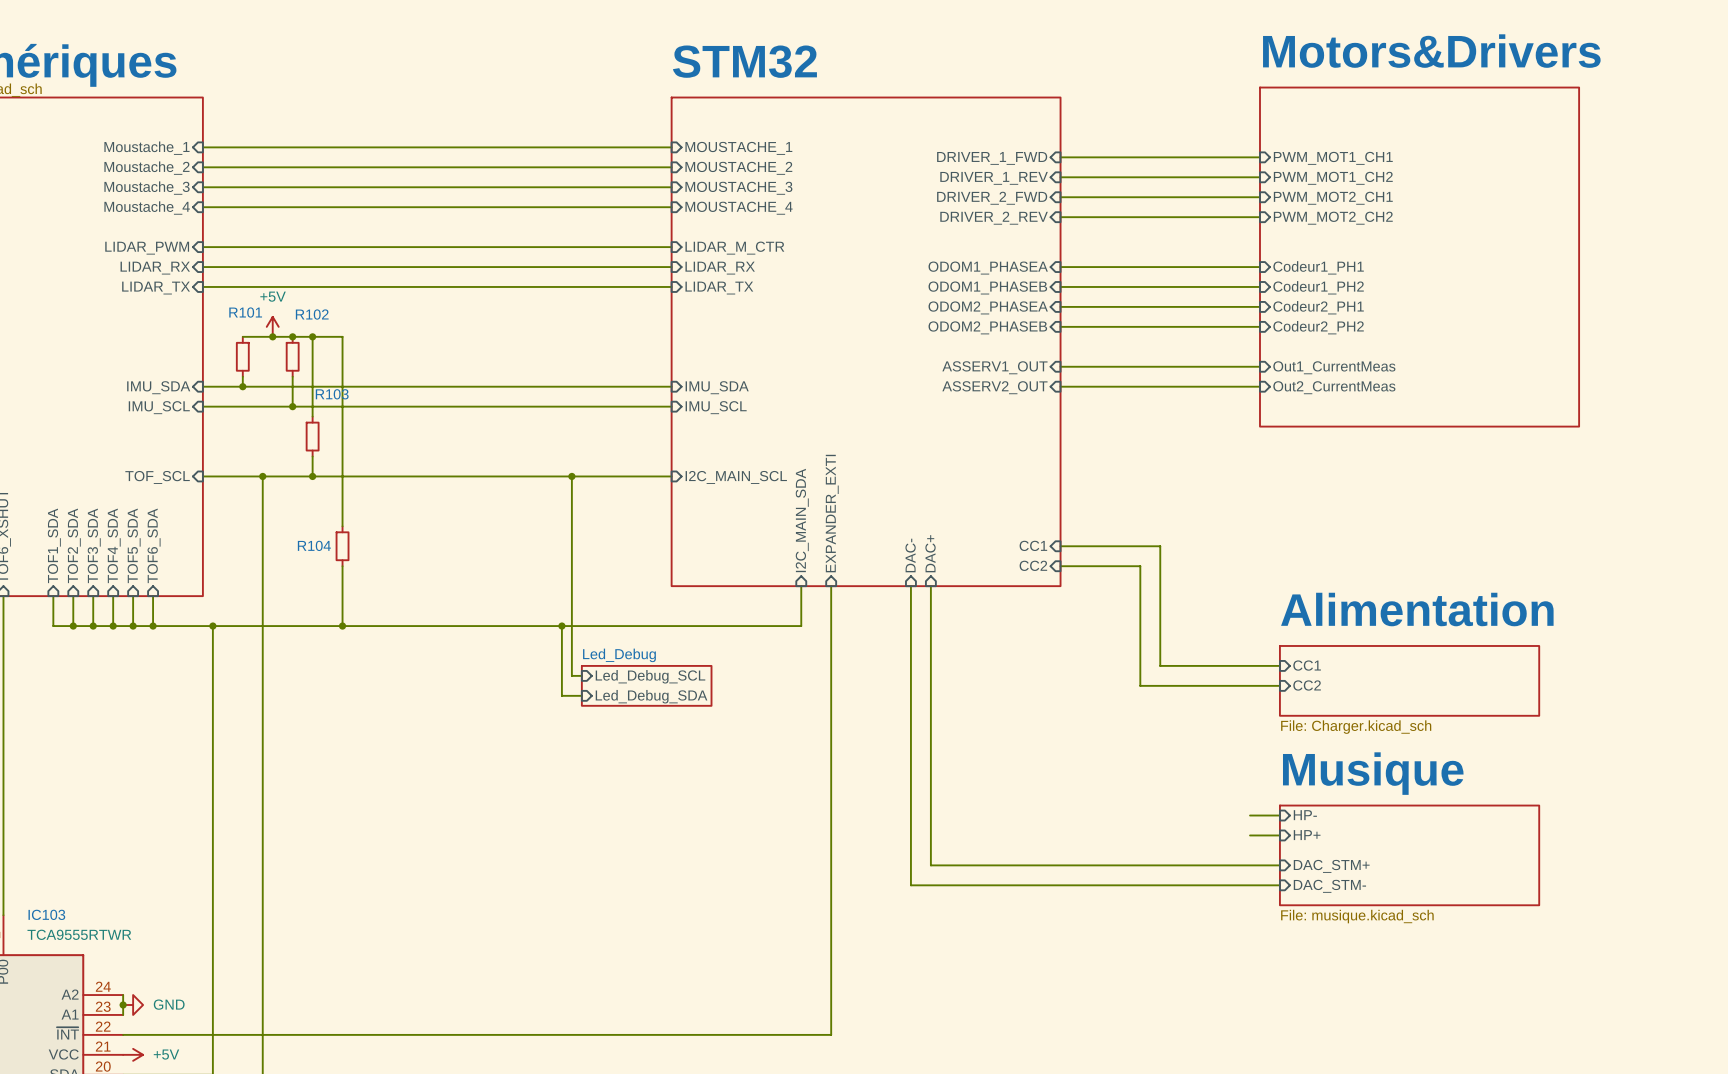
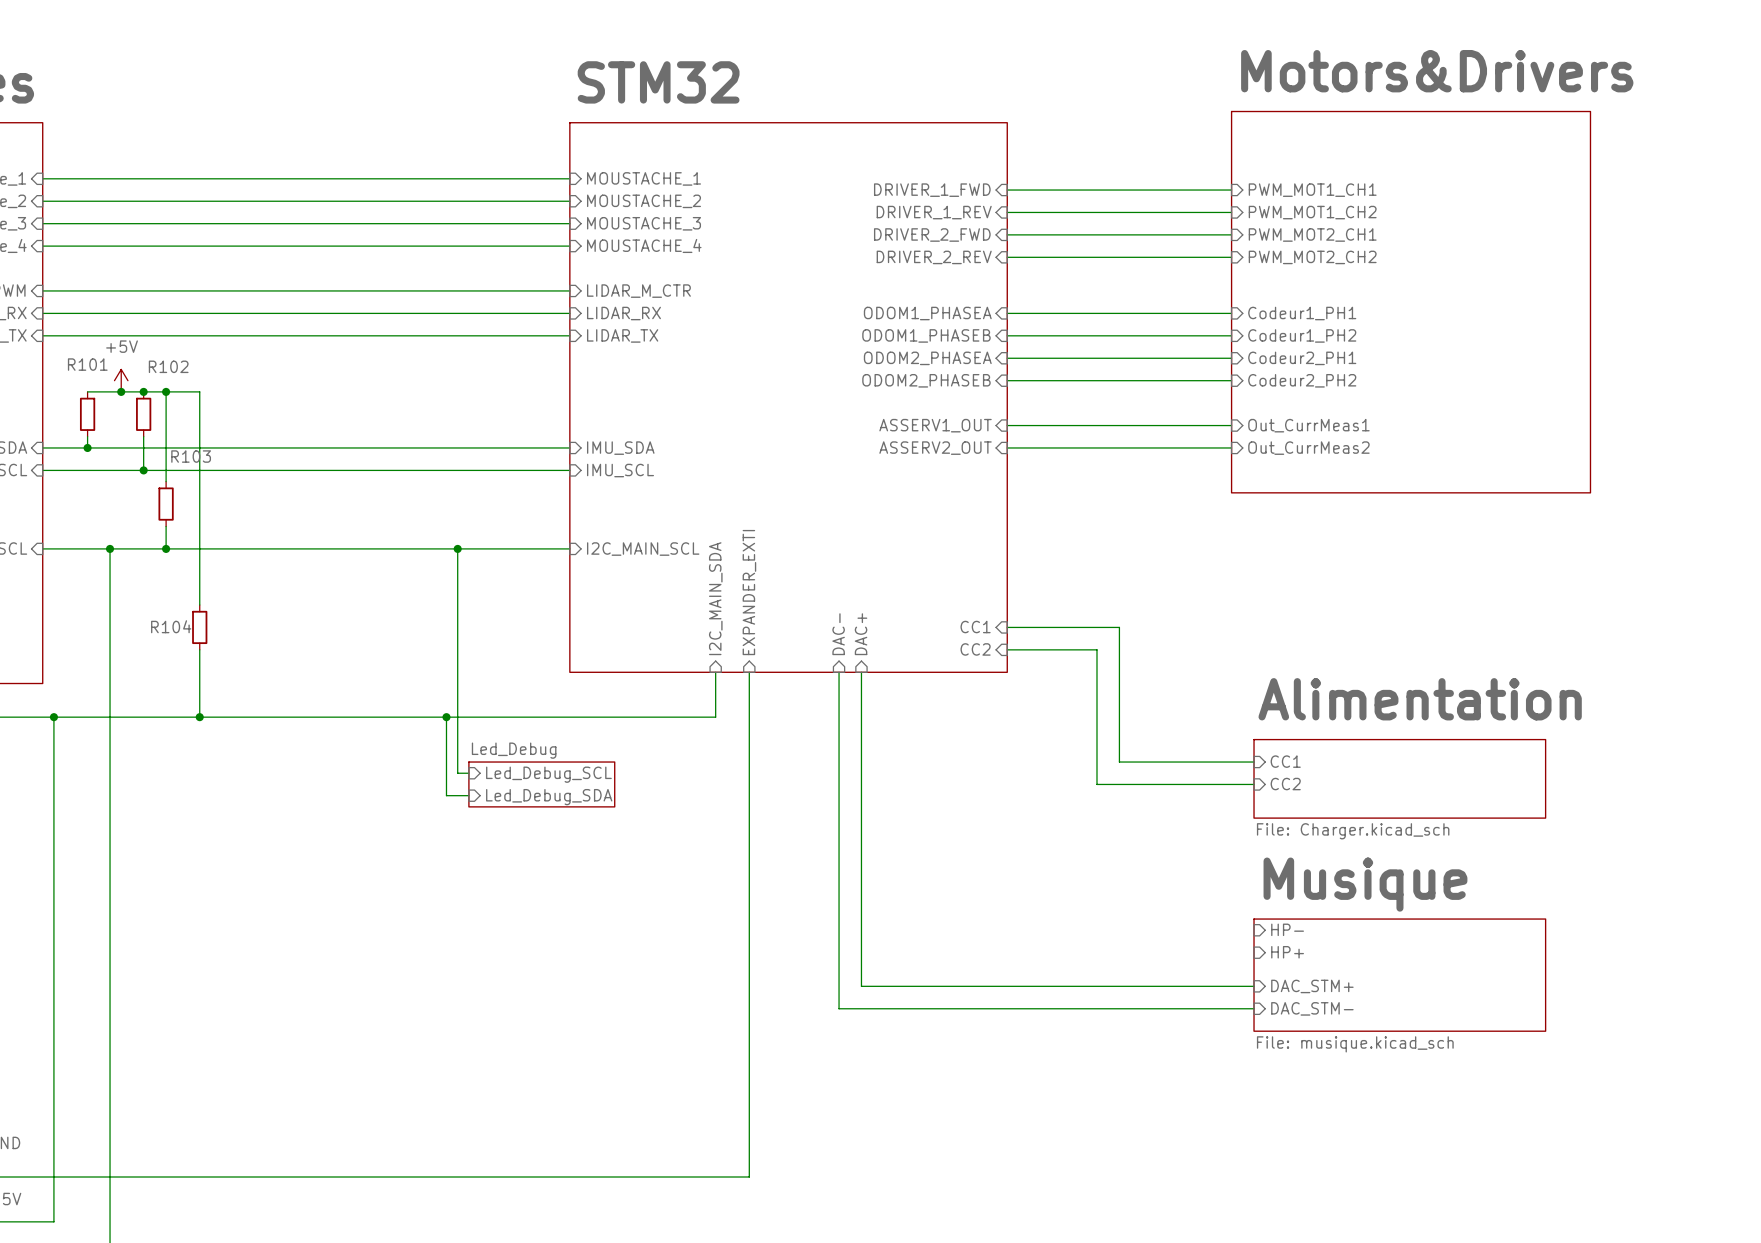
sheet pin: Out1_CurrentMeas (1334, 367) -> Out_CurrMeas1 (1308, 425)
sheet pin: Out2_CurrentMeas (1334, 387) -> Out_CurrMeas2 (1308, 448)
wire: (1250, 815) (1279, 815) -> none
wire: (1250, 835) (1279, 835) -> none

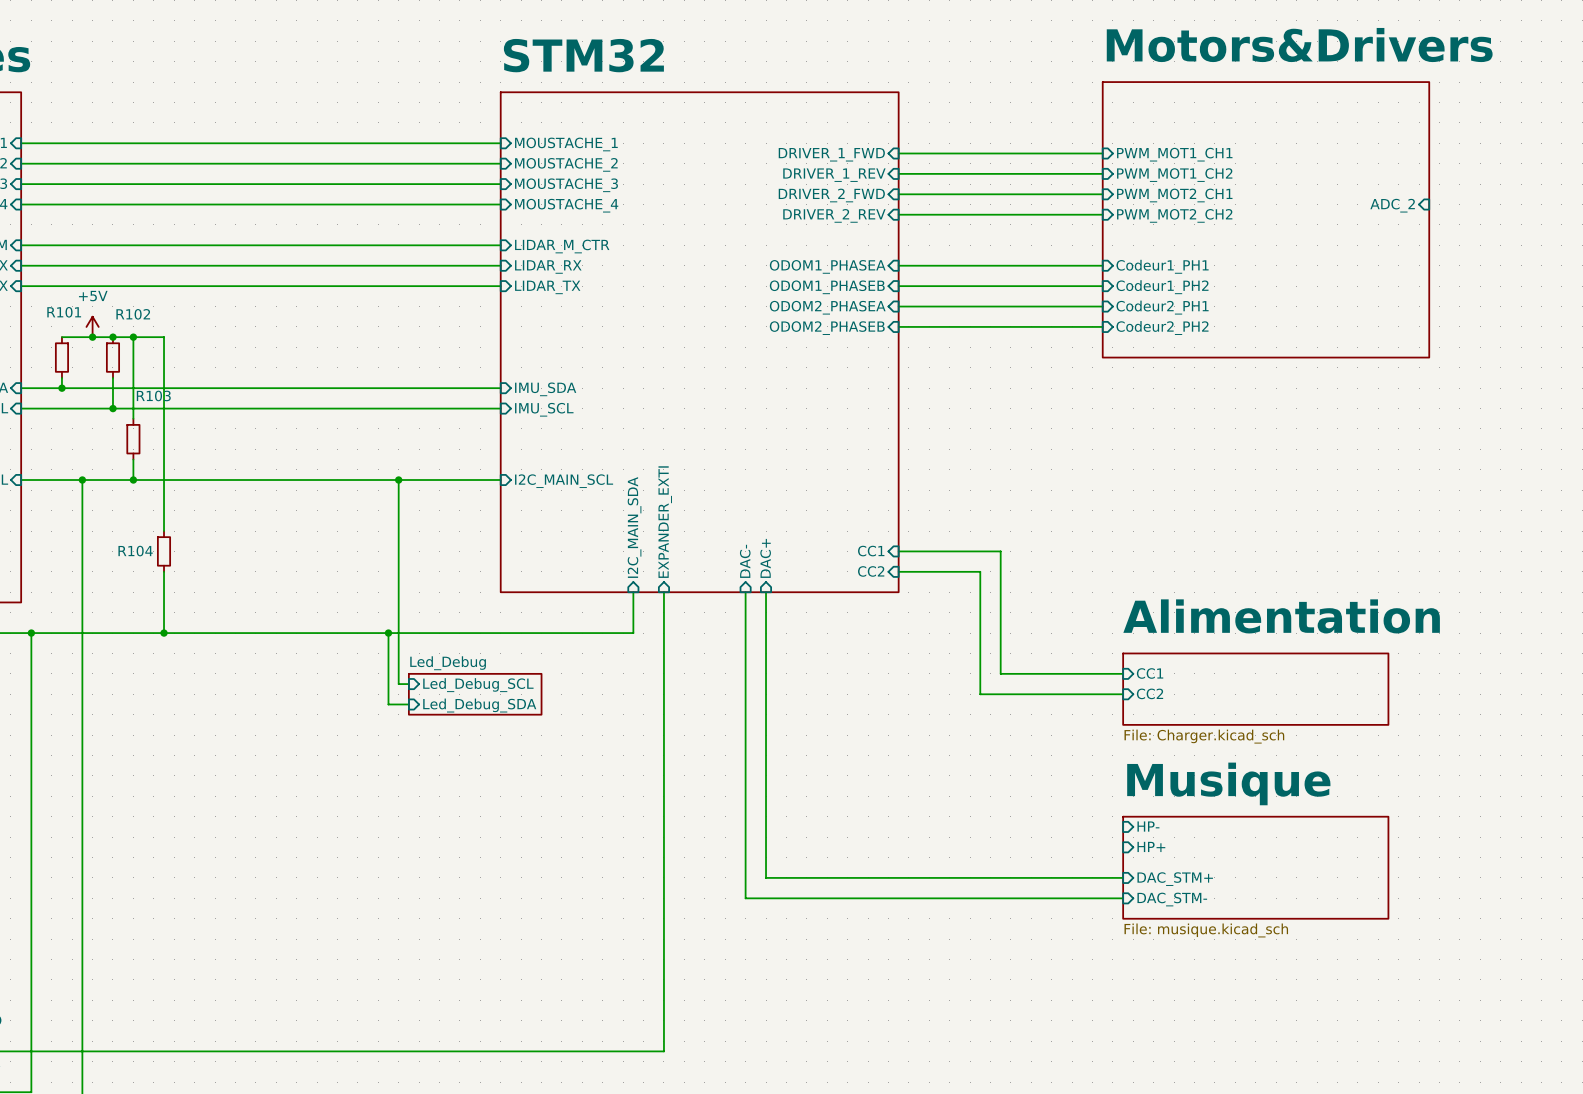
sheet pin: none -> ADC_2 (1392, 205)
sheet Motors&Drivers: none -> (1265, 219)
sheet Motors&Drivers: (1411, 302) -> none
sheet pin: ASSERV1_OUT (935, 425) -> none
wire: (1007, 425) (1231, 425) -> none
sheet pin: Out_CurrMeas1 (1308, 425) -> none
wire: (1007, 447) (1231, 447) -> none
sheet pin: ASSERV2_OUT (935, 448) -> none
sheet pin: Out_CurrMeas2 (1308, 448) -> none

